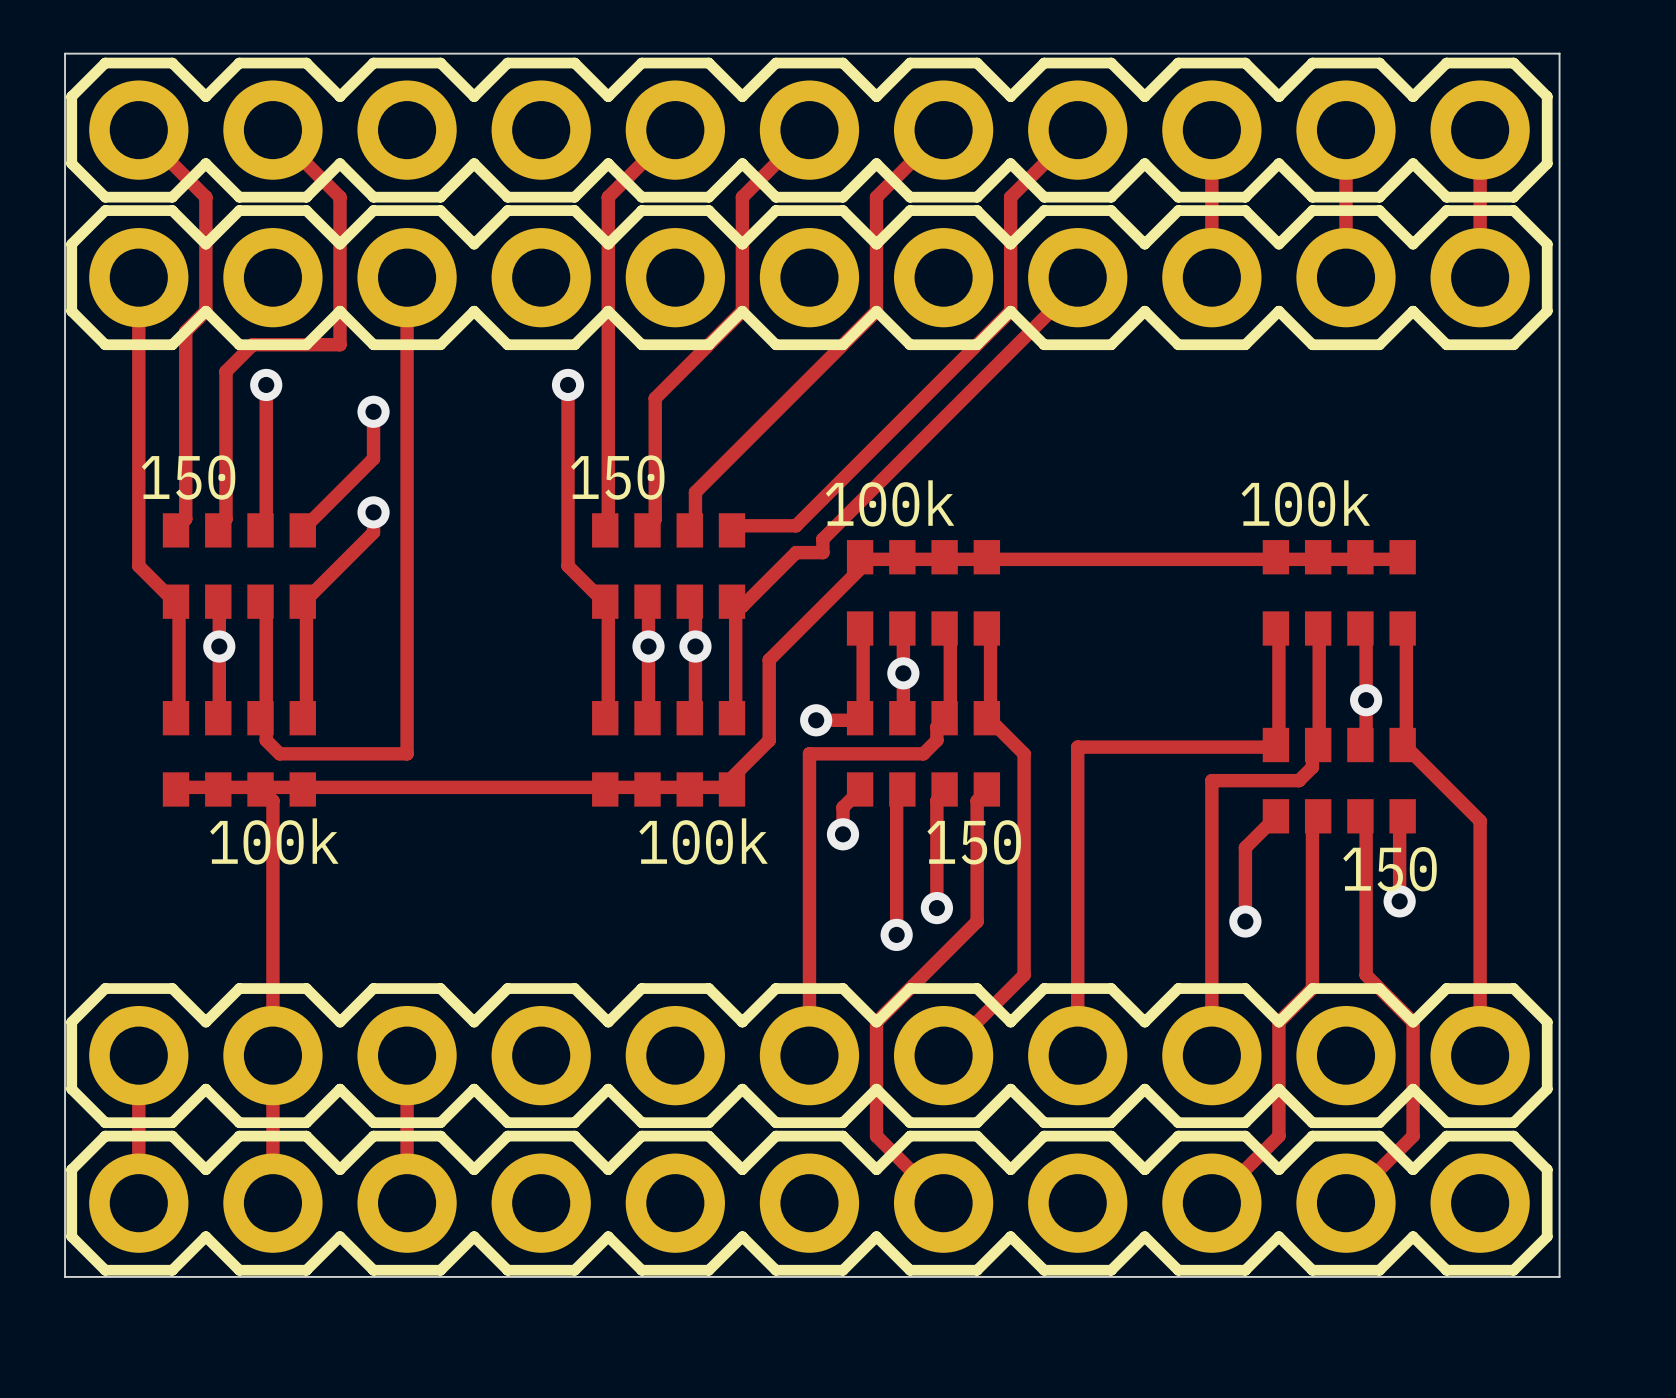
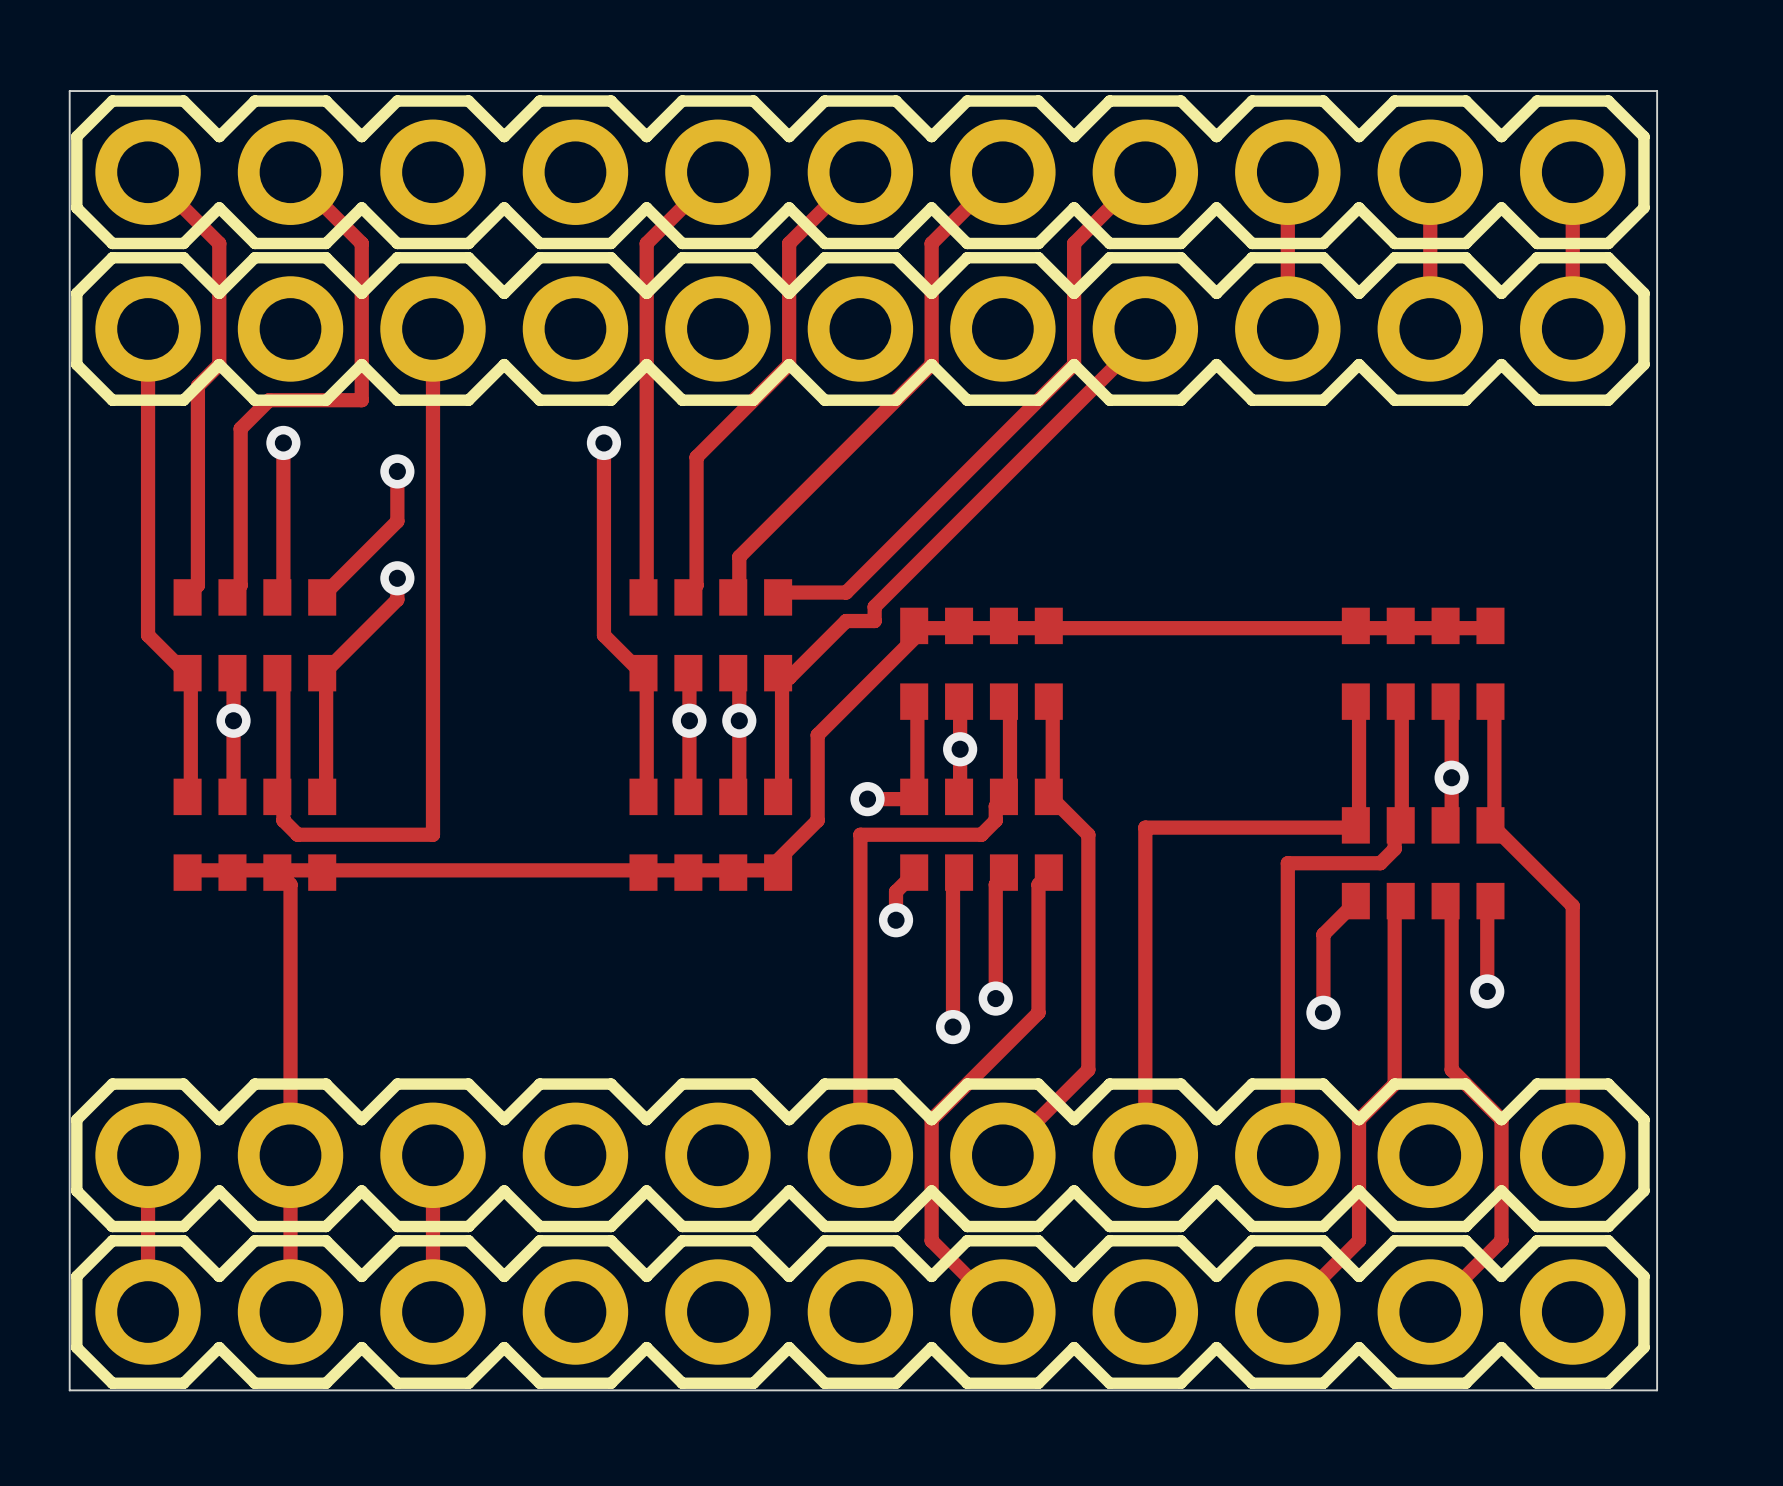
part value: 150 (188, 477) -> none
part value: 150 (617, 477) -> none
part value: 100k (890, 503) -> none
part value: 100k (1305, 503) -> none
part value: 100k (274, 841) -> none
part value: 100k (703, 841) -> none
part value: 150 (974, 842) -> none
part value: 150 (1390, 869) -> none

